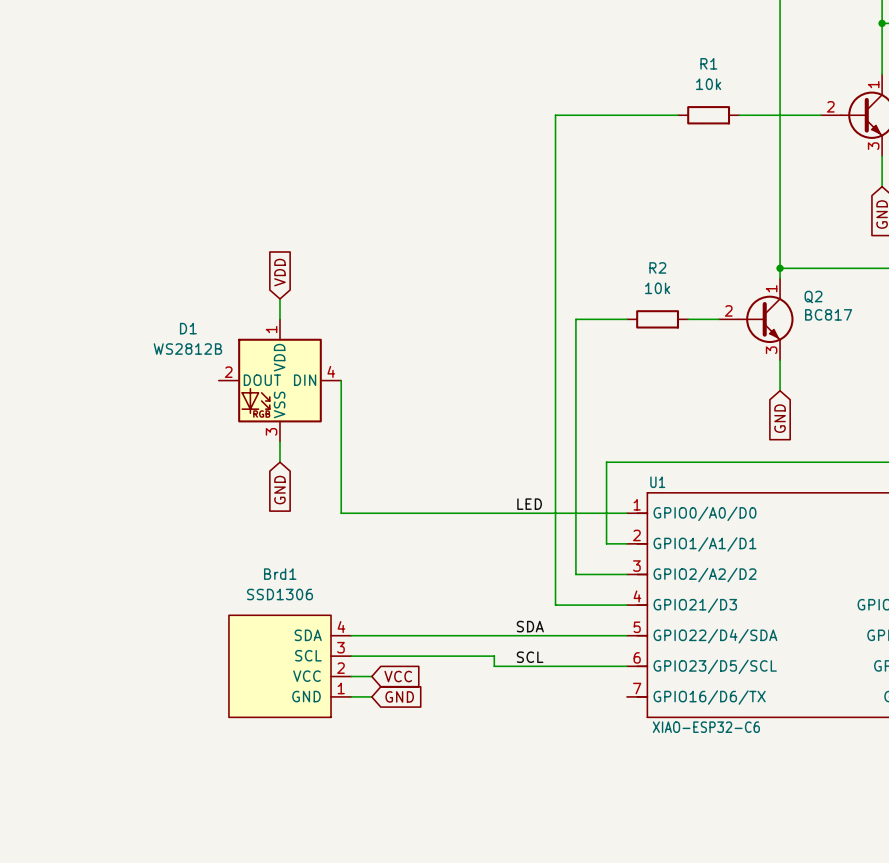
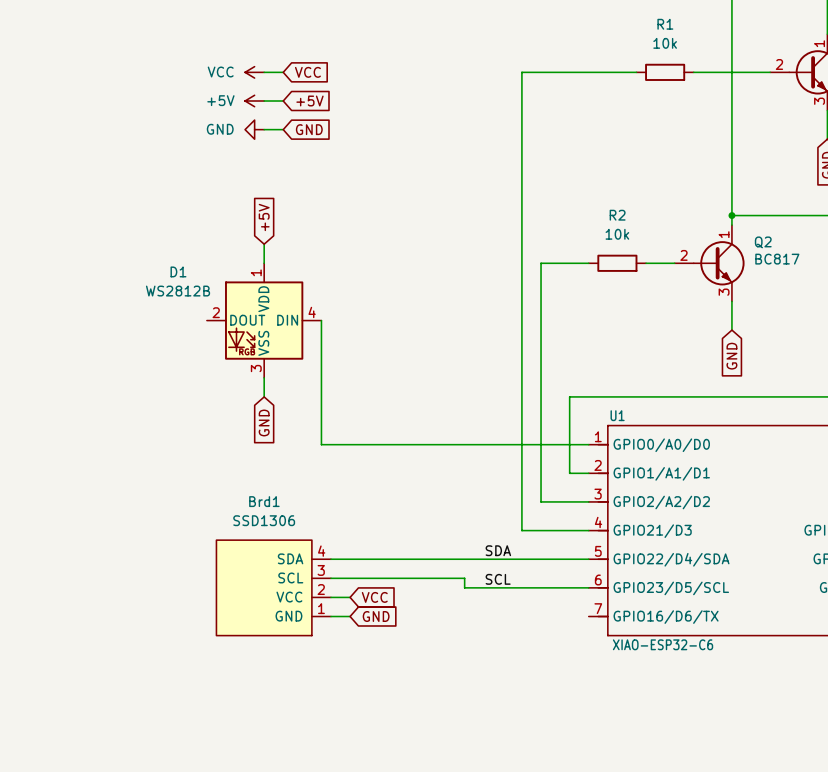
power symbol: none -> VCC (254, 72)
wire: none -> (264, 72) (283, 72)
global label: none -> VCC (307, 72)
power symbol: none -> +5V (254, 101)
wire: none -> (264, 101) (283, 101)
global label: none -> +5V (309, 101)
power symbol: none -> GND (254, 129)
wire: none -> (264, 129) (283, 129)
global label: none -> GND (309, 129)
global label: VDD (279, 272) -> +5V (264, 217)
label: LED (529, 504) -> none

